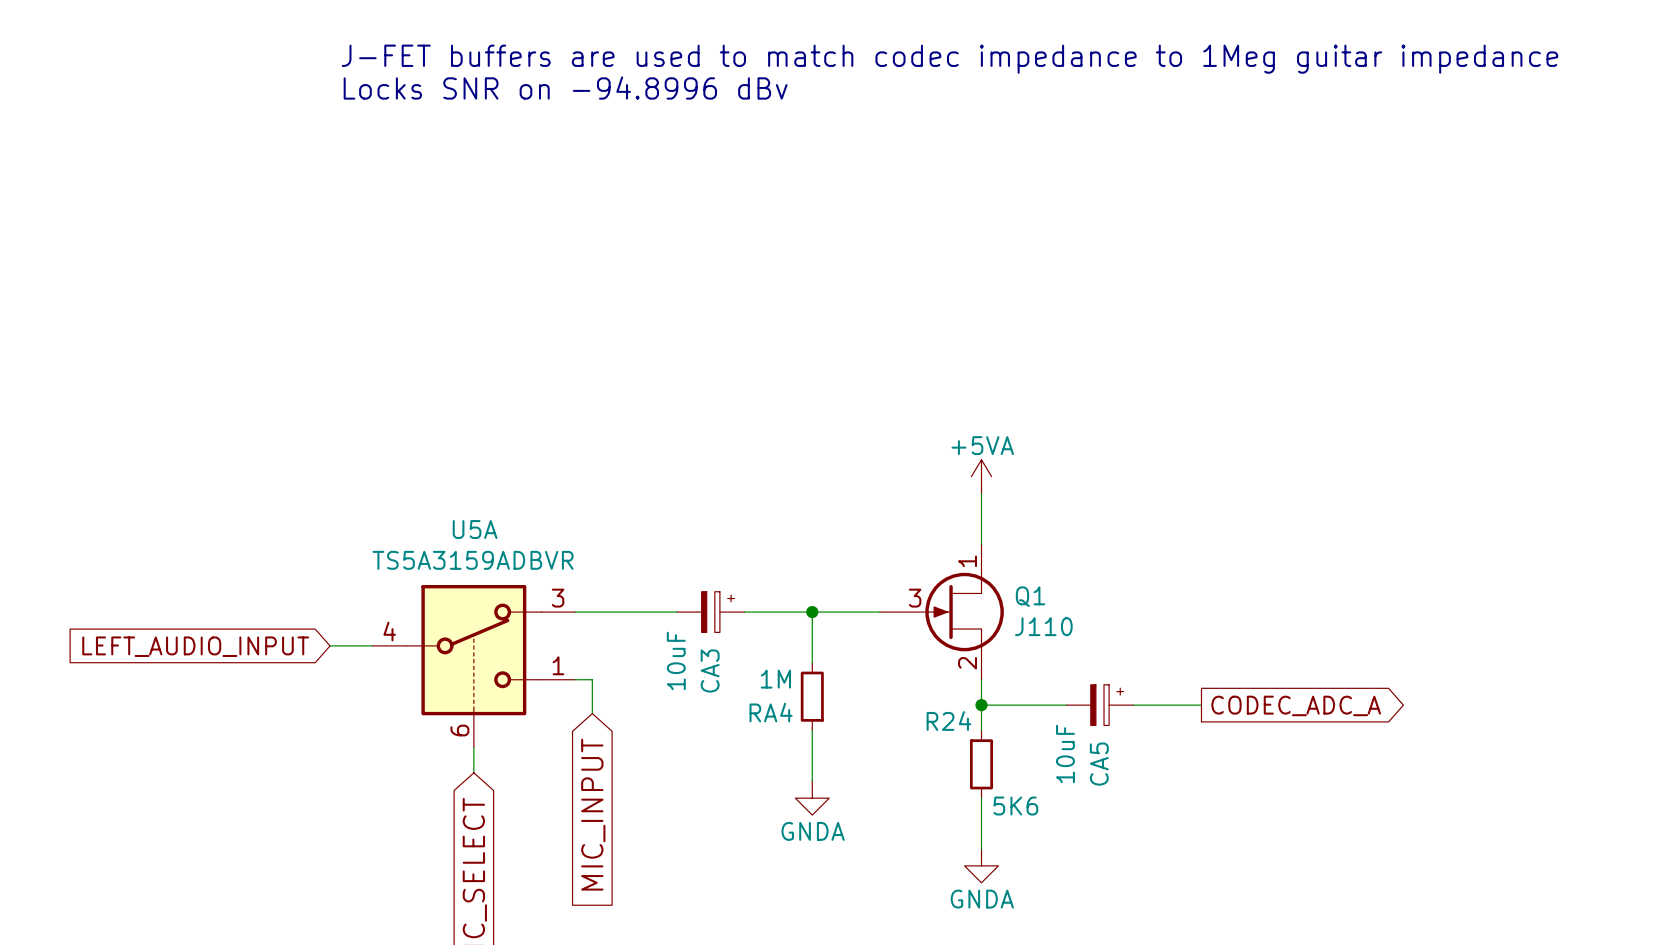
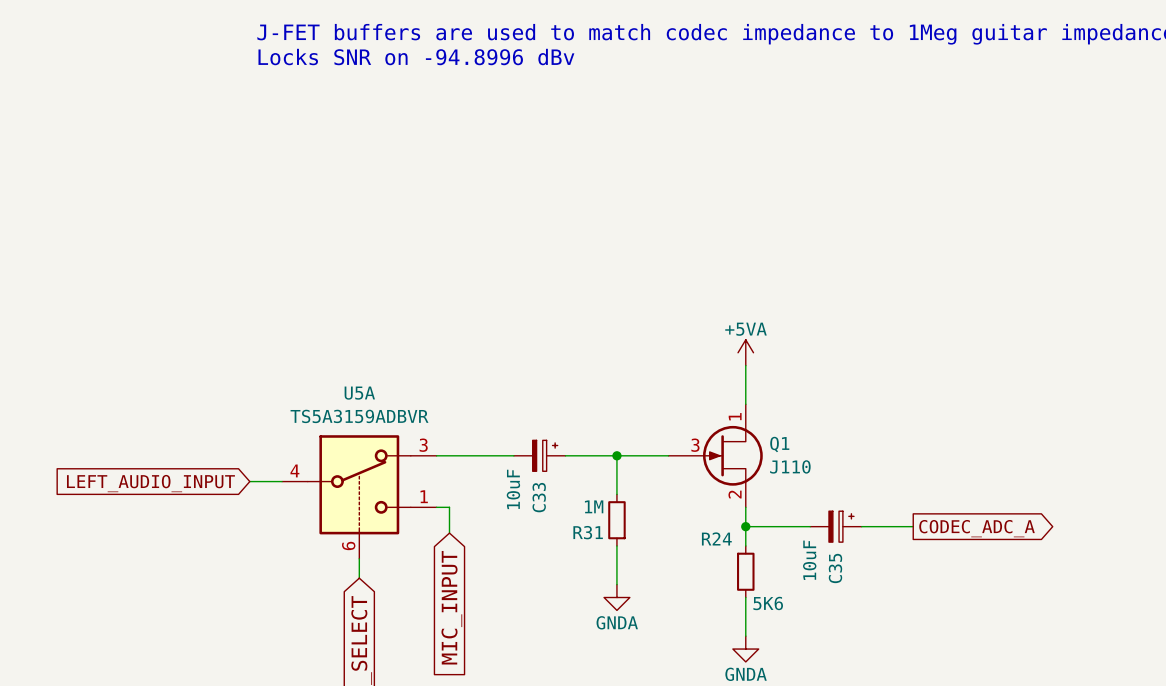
CA3 name: CA3 (710, 671) -> C33 (539, 497)
RA4 name: RA4 (771, 712) -> R31 (588, 532)
CA5 name: CA5 (1099, 764) -> C35 (835, 568)

